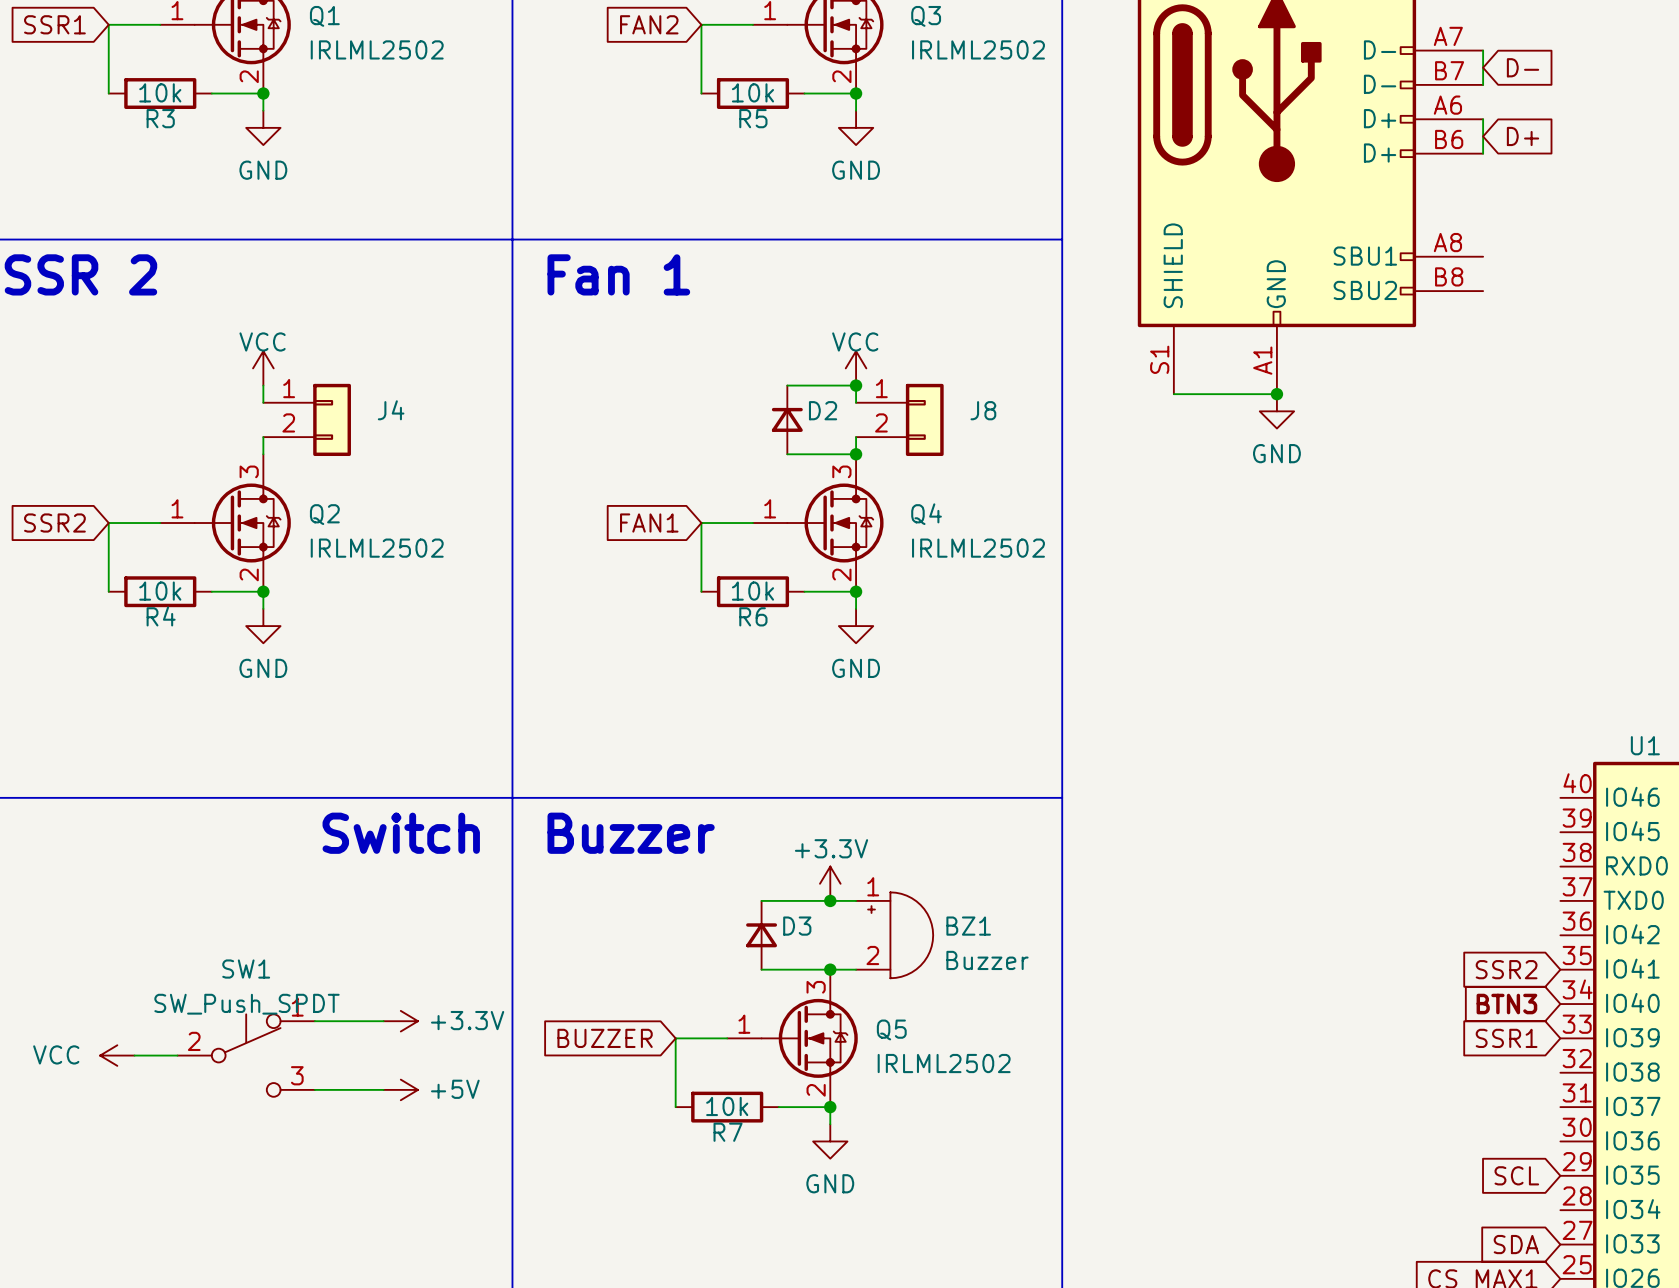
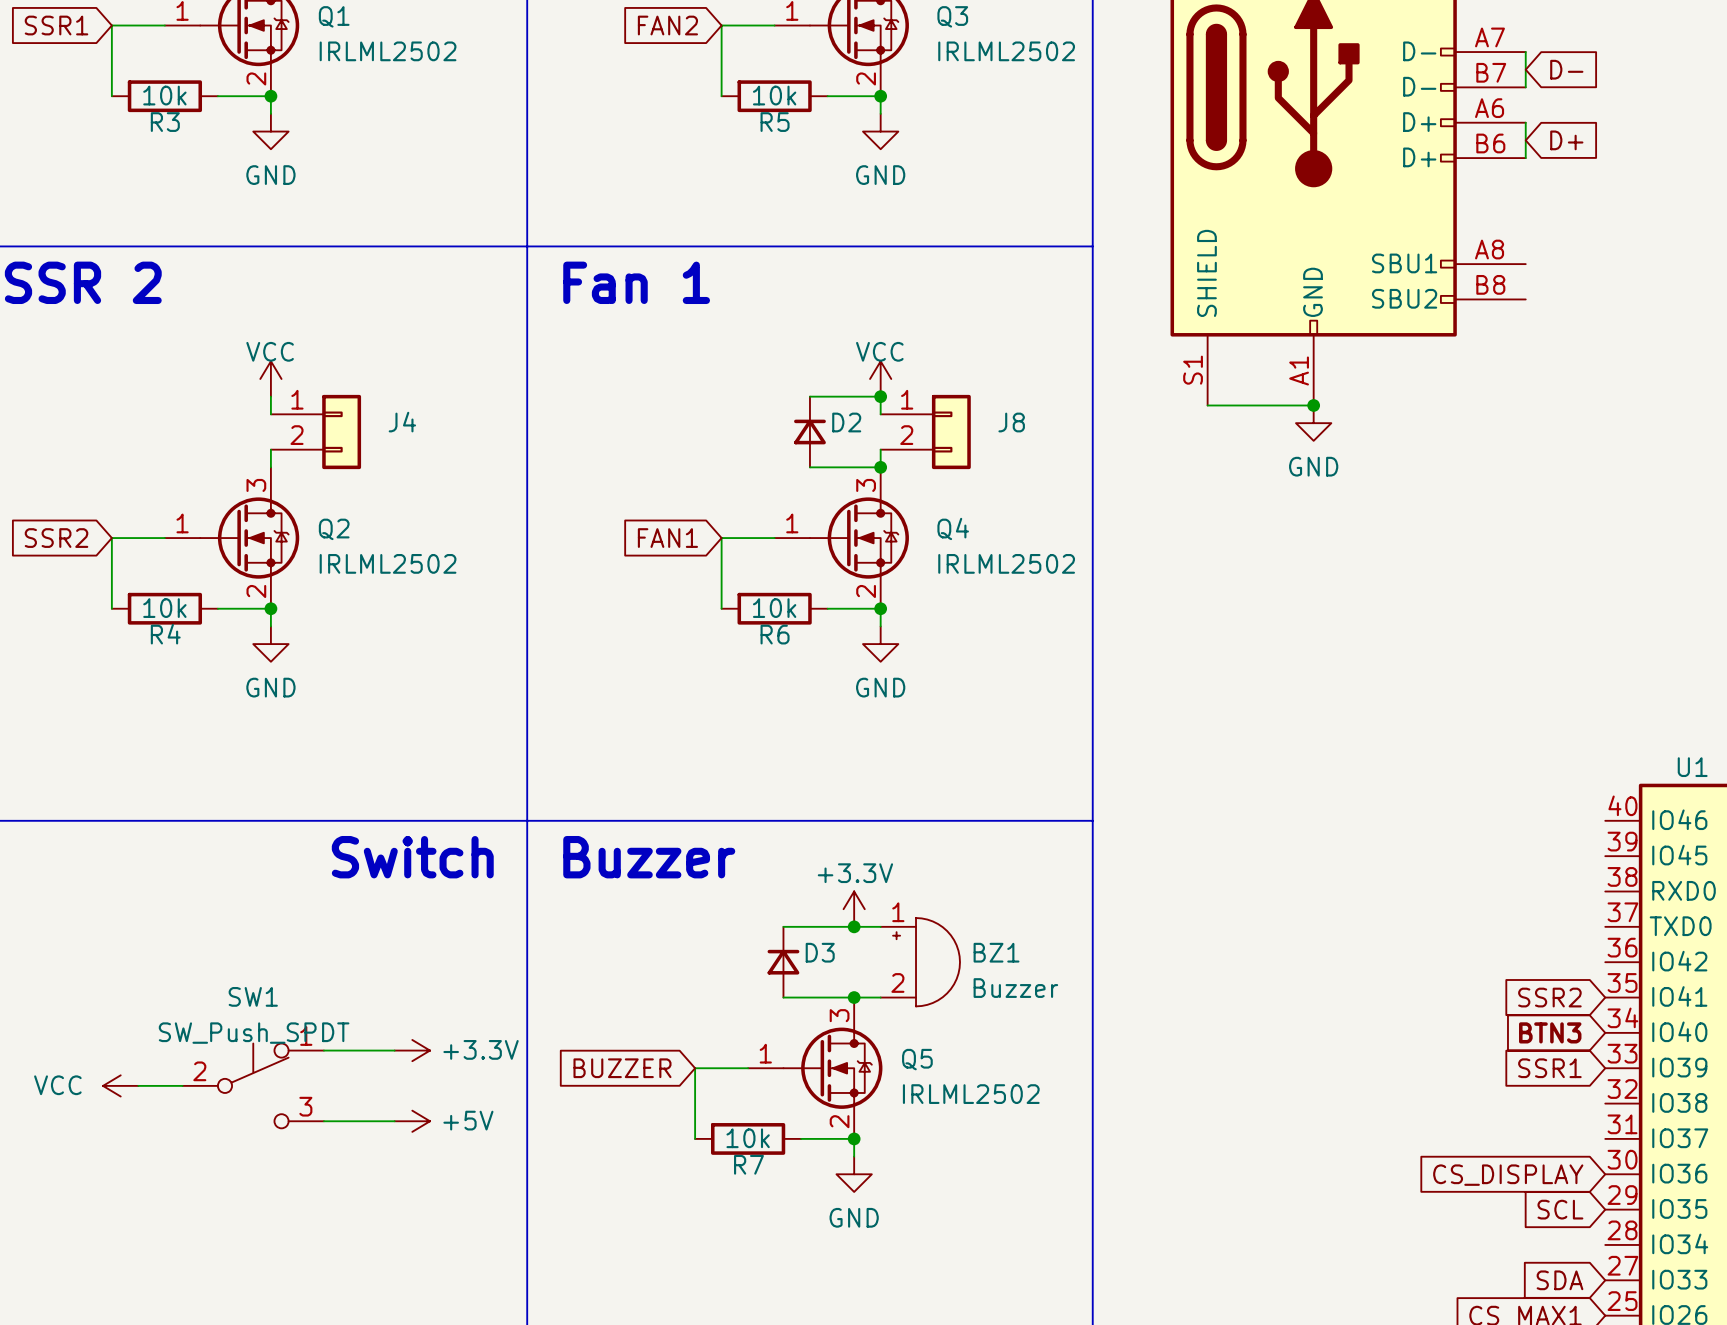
global label: none -> CS_DISPLAY (1508, 1175)

